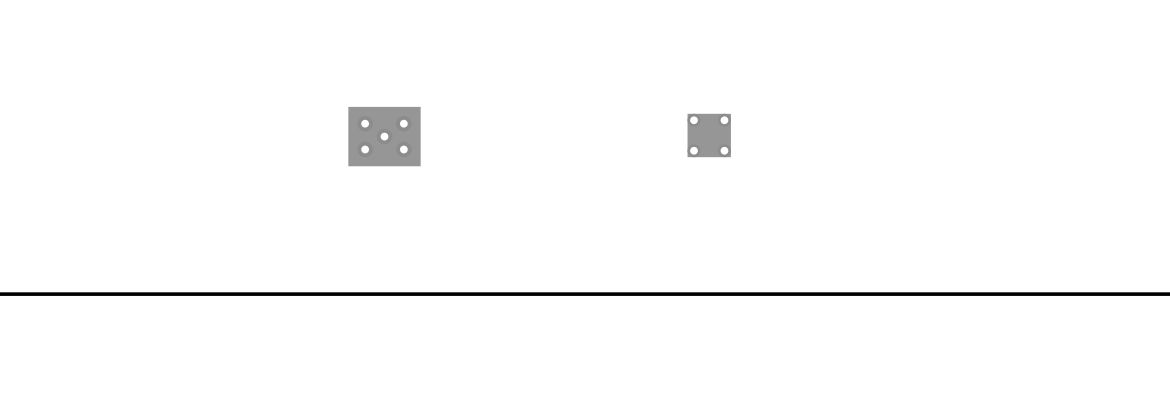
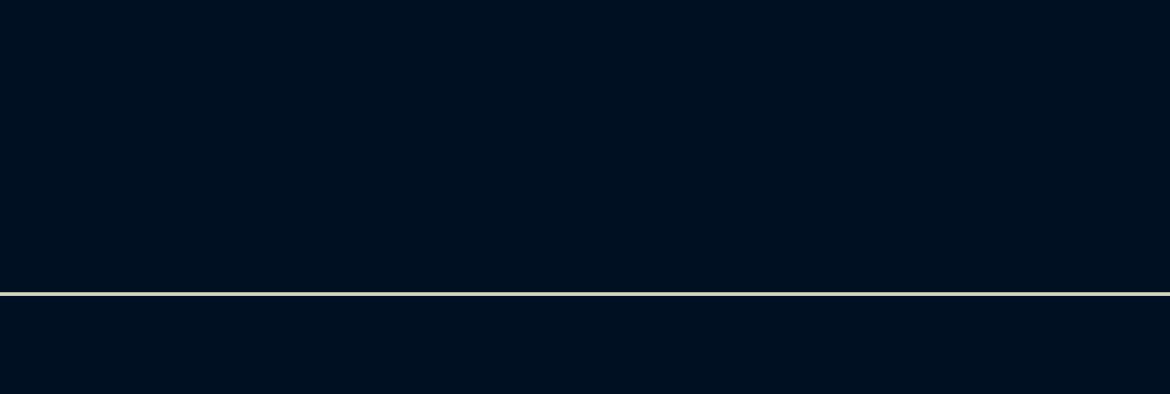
part: (709, 135) -> none
part: (384, 136) -> none

